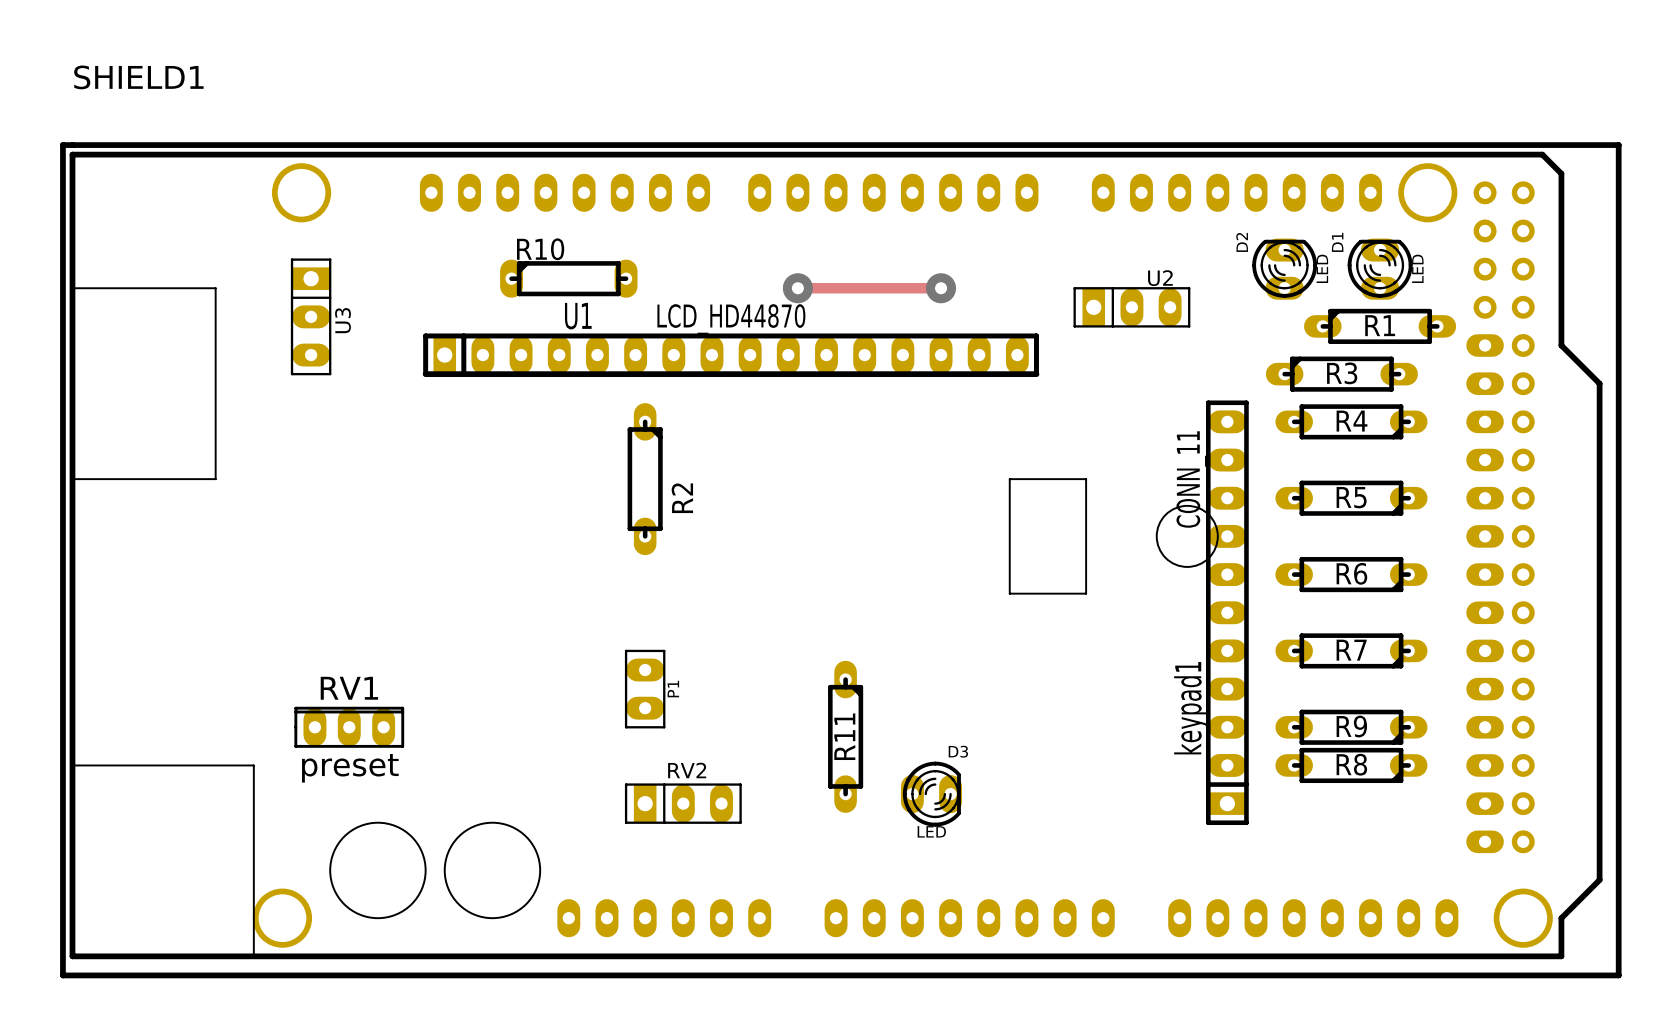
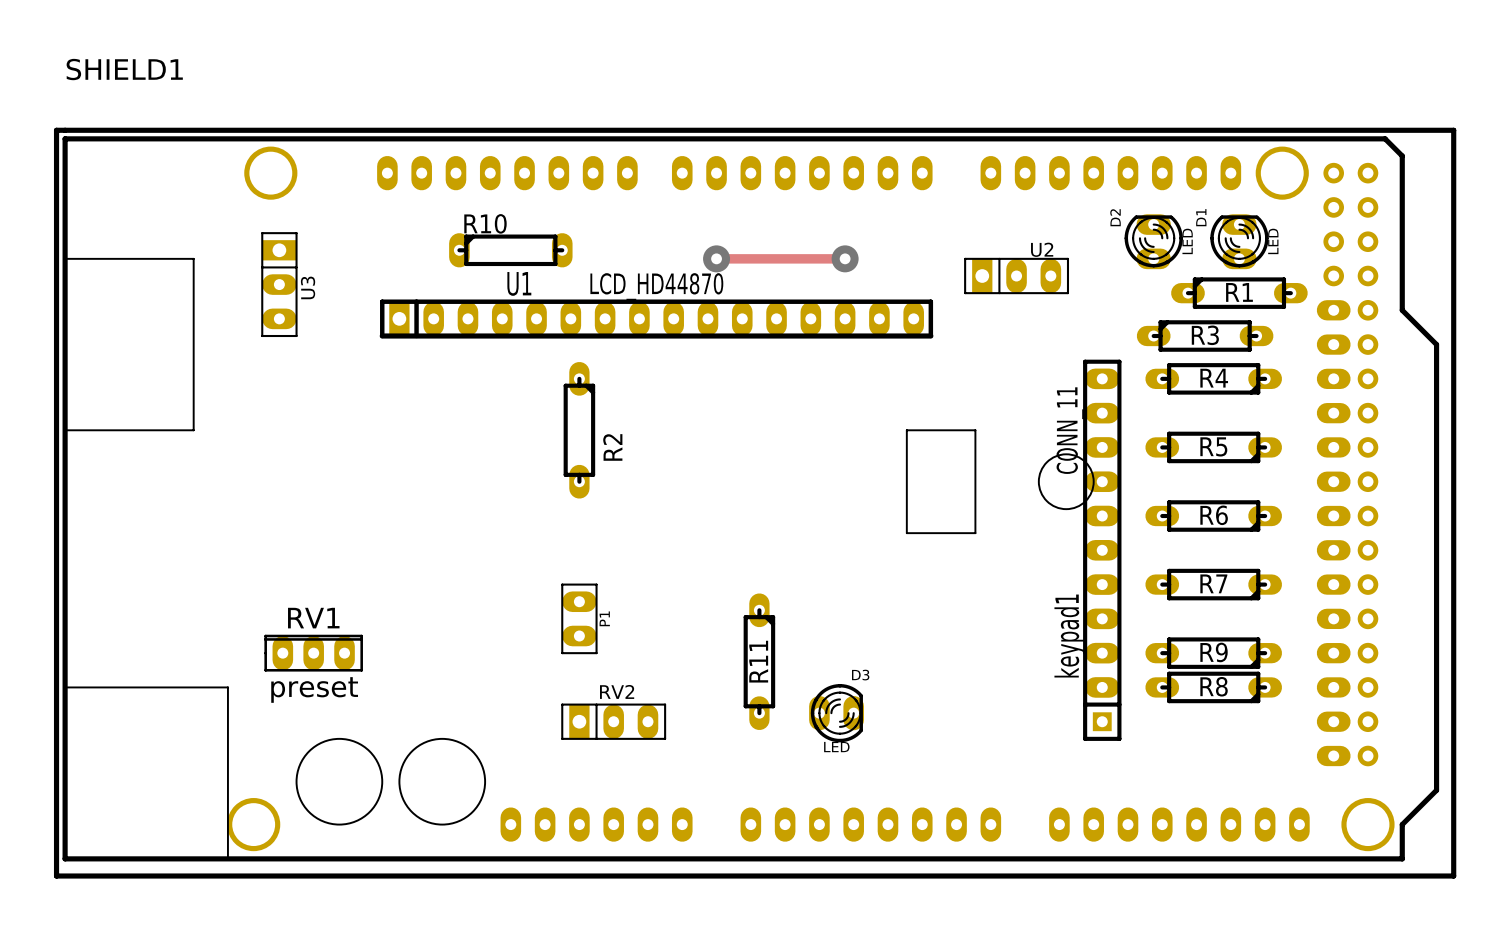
keypad1 footprint: [1205, 400, 1249, 826] -> [1083, 359, 1122, 741]

